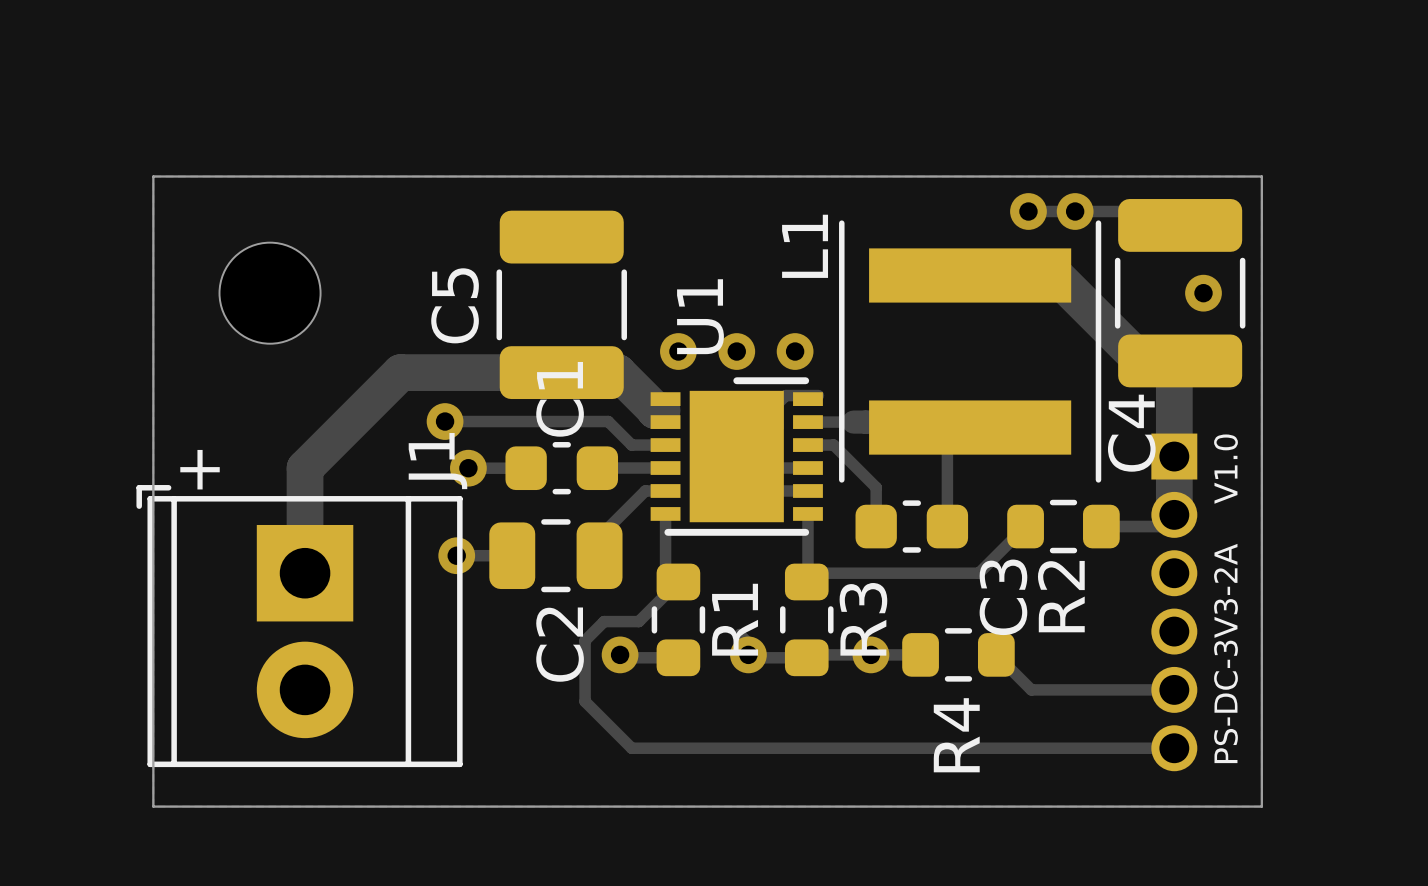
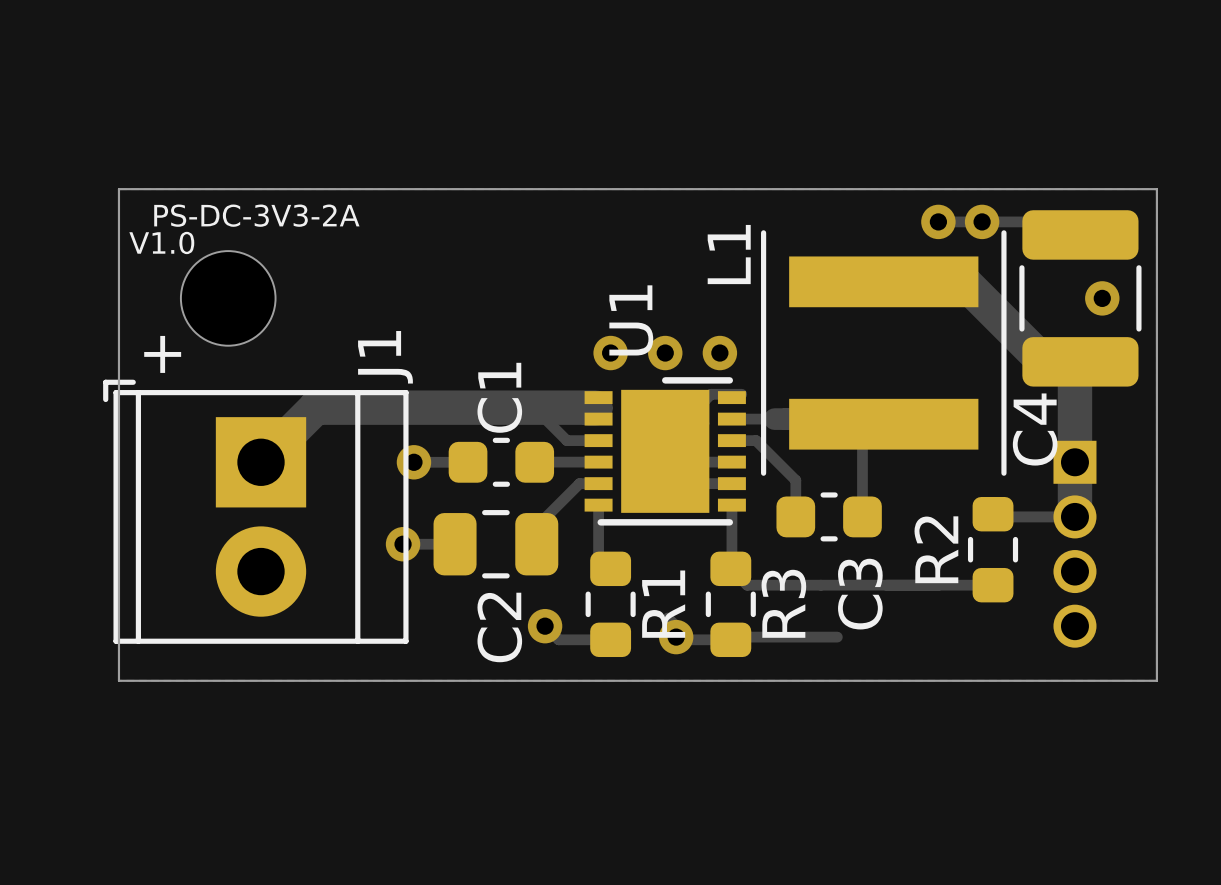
C5: (561, 304) -> none
track: (363, 409) (400, 372) (617, 372) (655, 409) -> (315, 407) (595, 407)
via: (445, 421) -> none
track: (305, 468) (305, 526) -> none
text position: + (200, 469) -> + (162, 354)
text rotation: 0° (1225, 469) -> 90° clockwise (161, 242)
text position: V1.0 (1225, 469) -> V1.0 (161, 242)
track: (1025, 526) (978, 573) (818, 573) (818, 584) -> none
R2 rotation: 0° (1063, 526) -> 90° clockwise (993, 549)
part: none -> (1074, 544)
track: (678, 581) (638, 621) (604, 621) (585, 640) (585, 701) (631, 748) (1174, 748) -> none
track: none -> (730, 568) (747, 585) (993, 585)
C3 name position: C3 (1003, 597) -> C3 (860, 594)
part: (1174, 602) -> none
J1 position: (299, 626) -> (255, 511)
text rotation: 0° (1225, 653) -> 90° clockwise (256, 215)
text position: PS-DC-3V3-2A (1225, 653) -> PS-DC-3V3-2A (256, 215)
via position: (620, 654) -> (545, 626)
via: (870, 654) -> none
R4: (958, 654) -> none
track: (996, 654) (1031, 689) (1174, 689) (1162, 701) -> none
board edge: (153, 701) (153, 806) (1261, 806) (1261, 701) -> (118, 680) (1156, 680)

